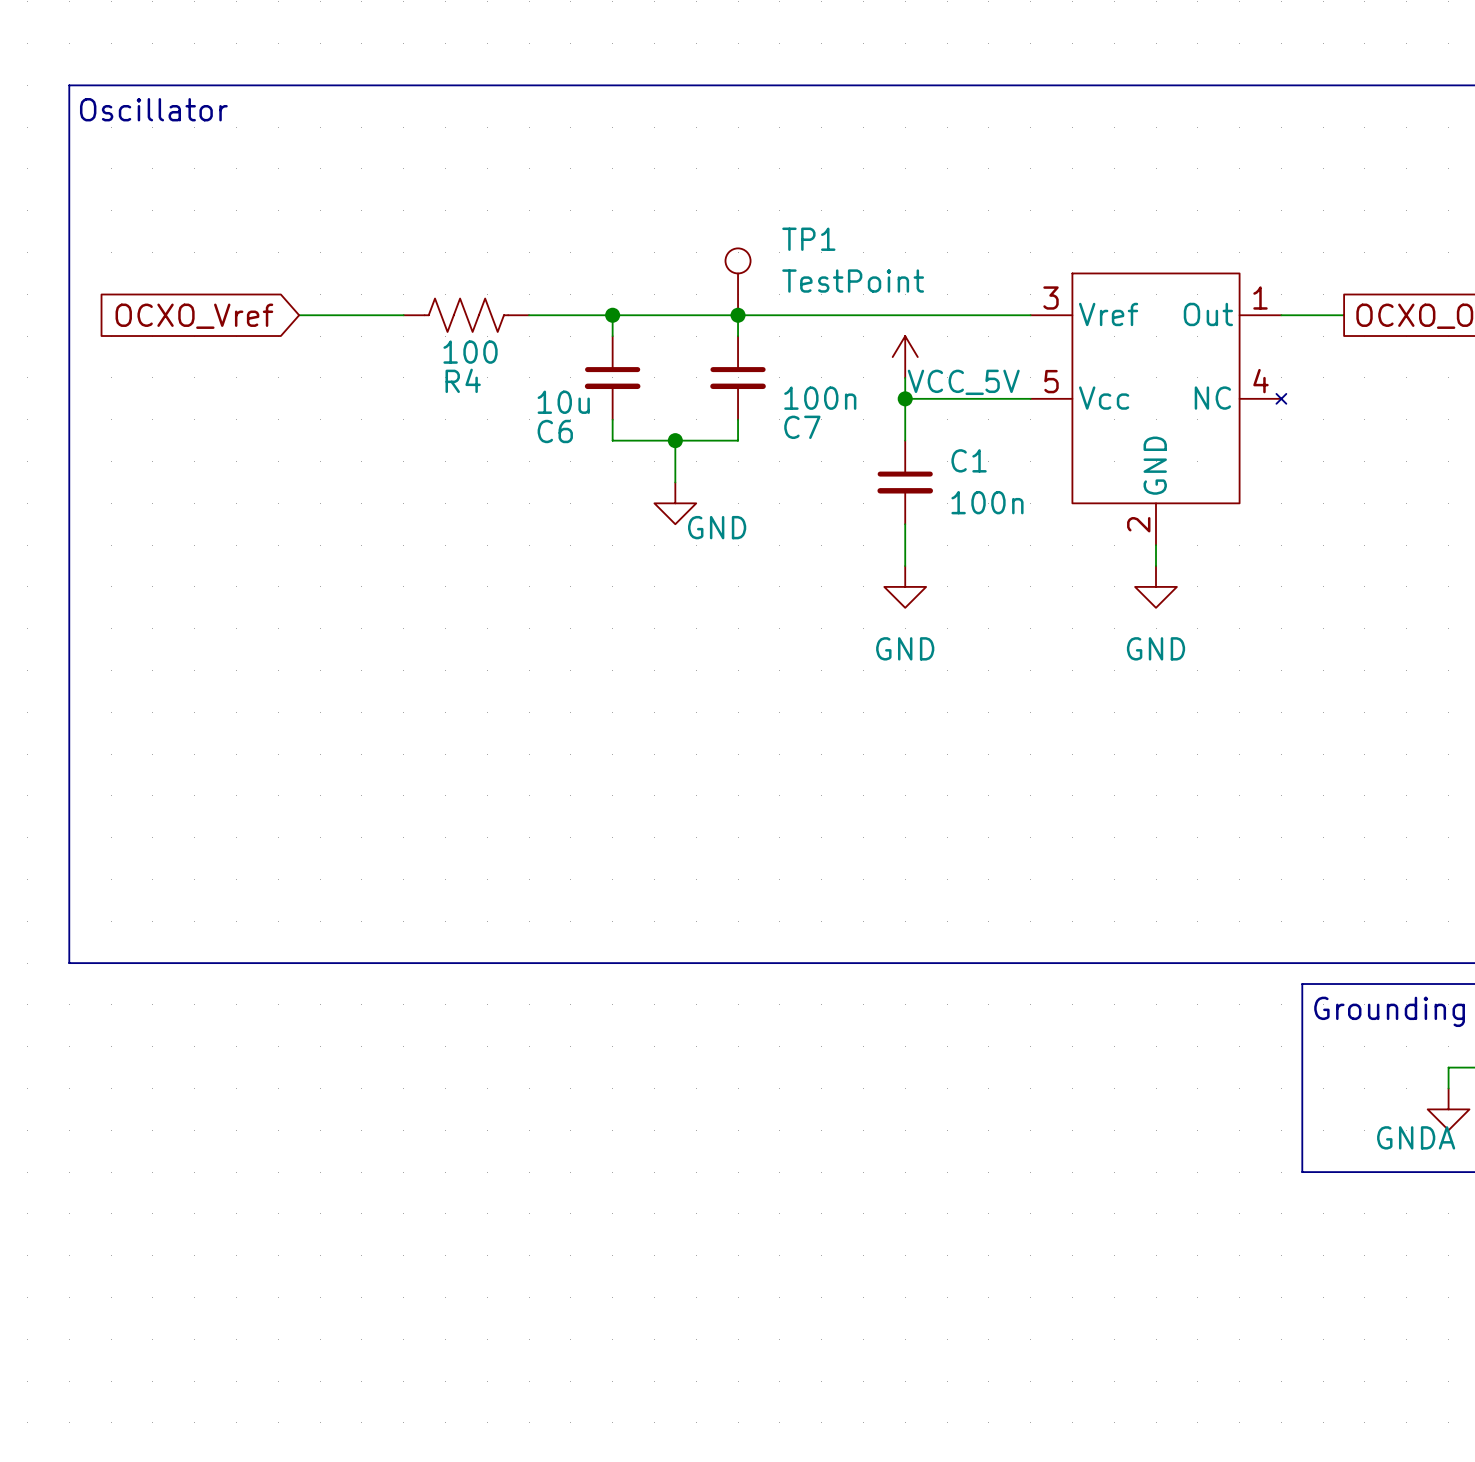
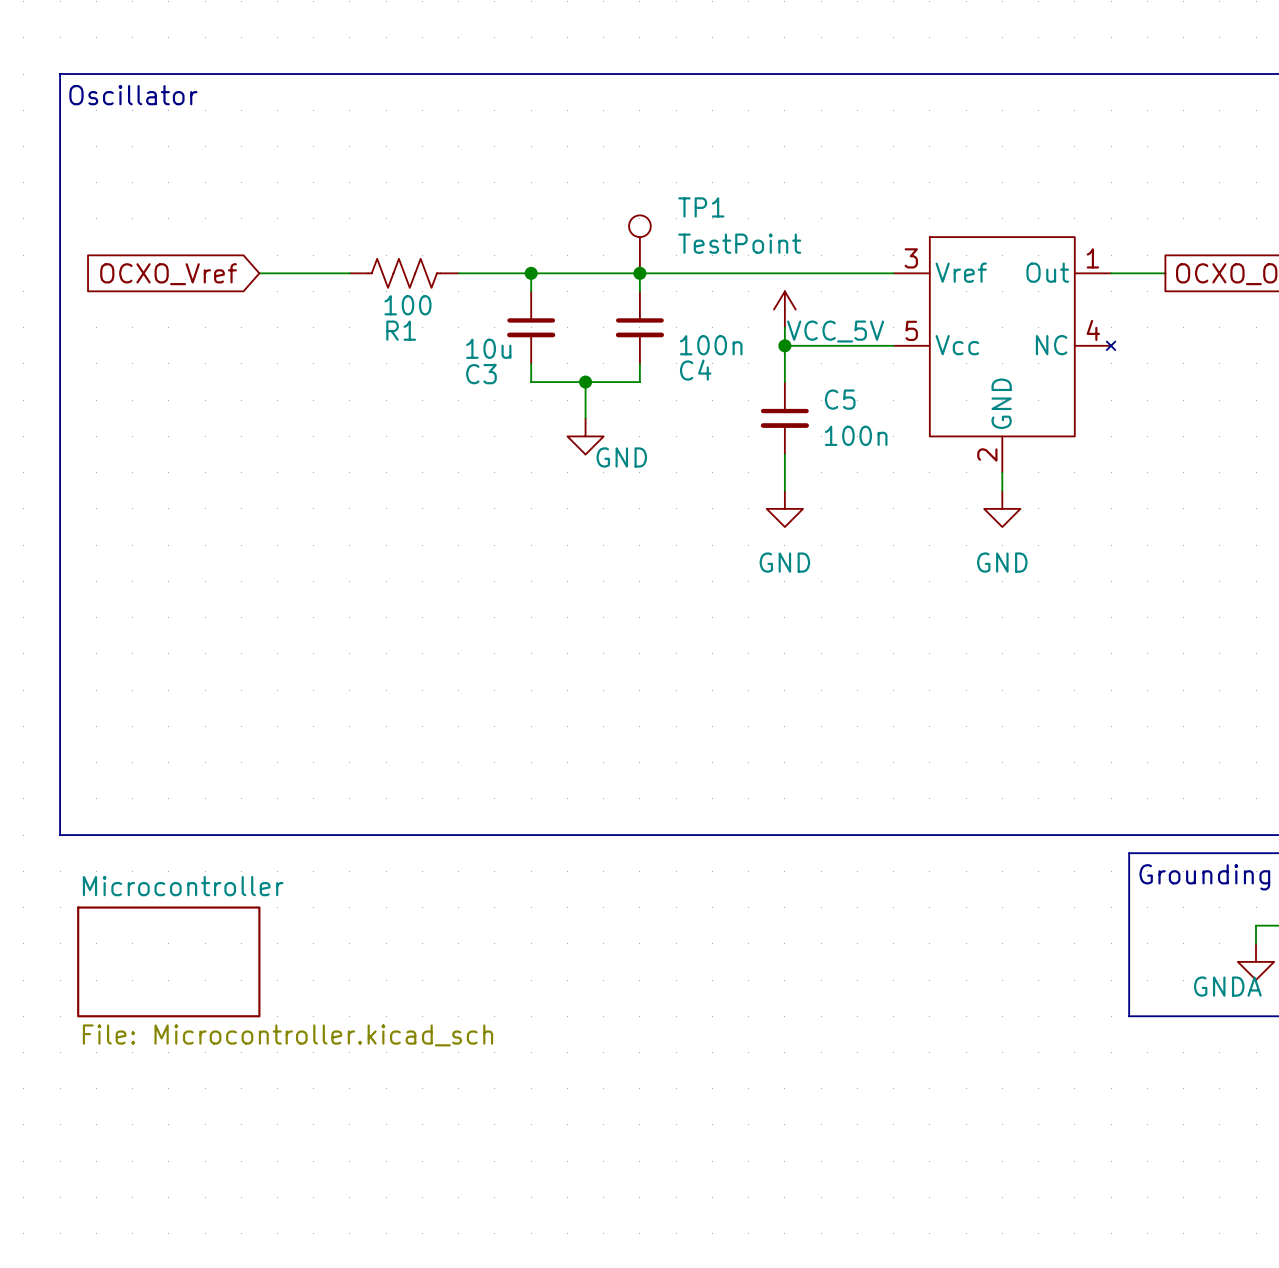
R4 name: R4 (463, 380) -> R1 (401, 330)
C7 name: C7 (802, 427) -> C4 (695, 370)
C6 name: C6 (555, 431) -> C3 (481, 374)
C1 name: C1 (969, 460) -> C5 (840, 399)
sheet Microcontroller: none -> File: Microcontroller.kicad_sch (168, 961)

